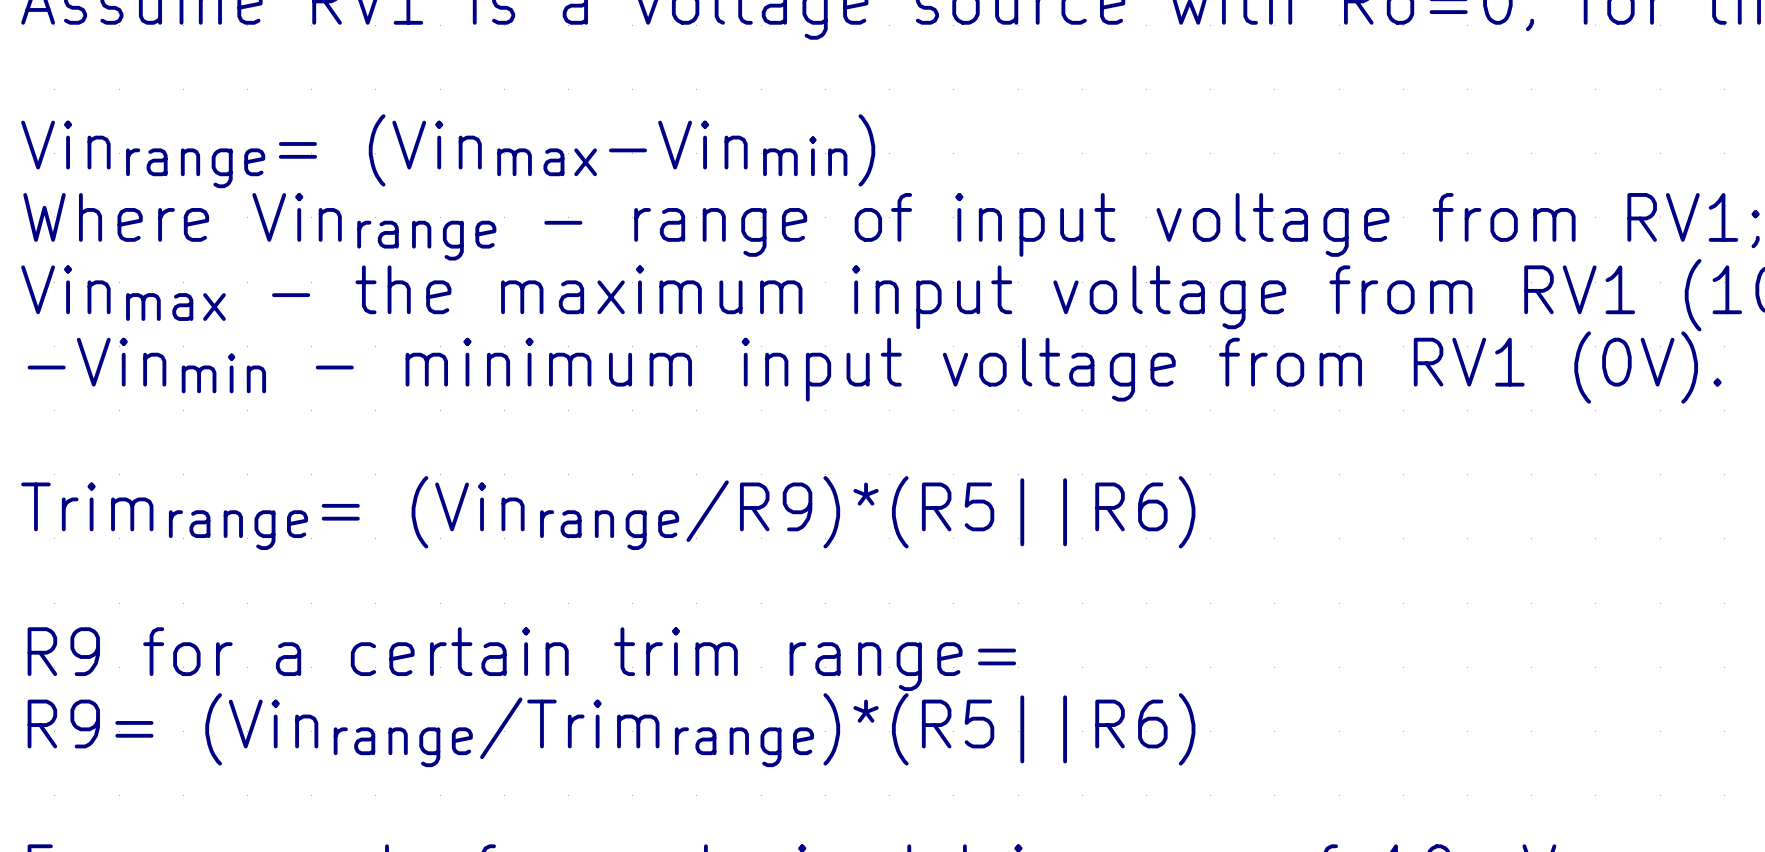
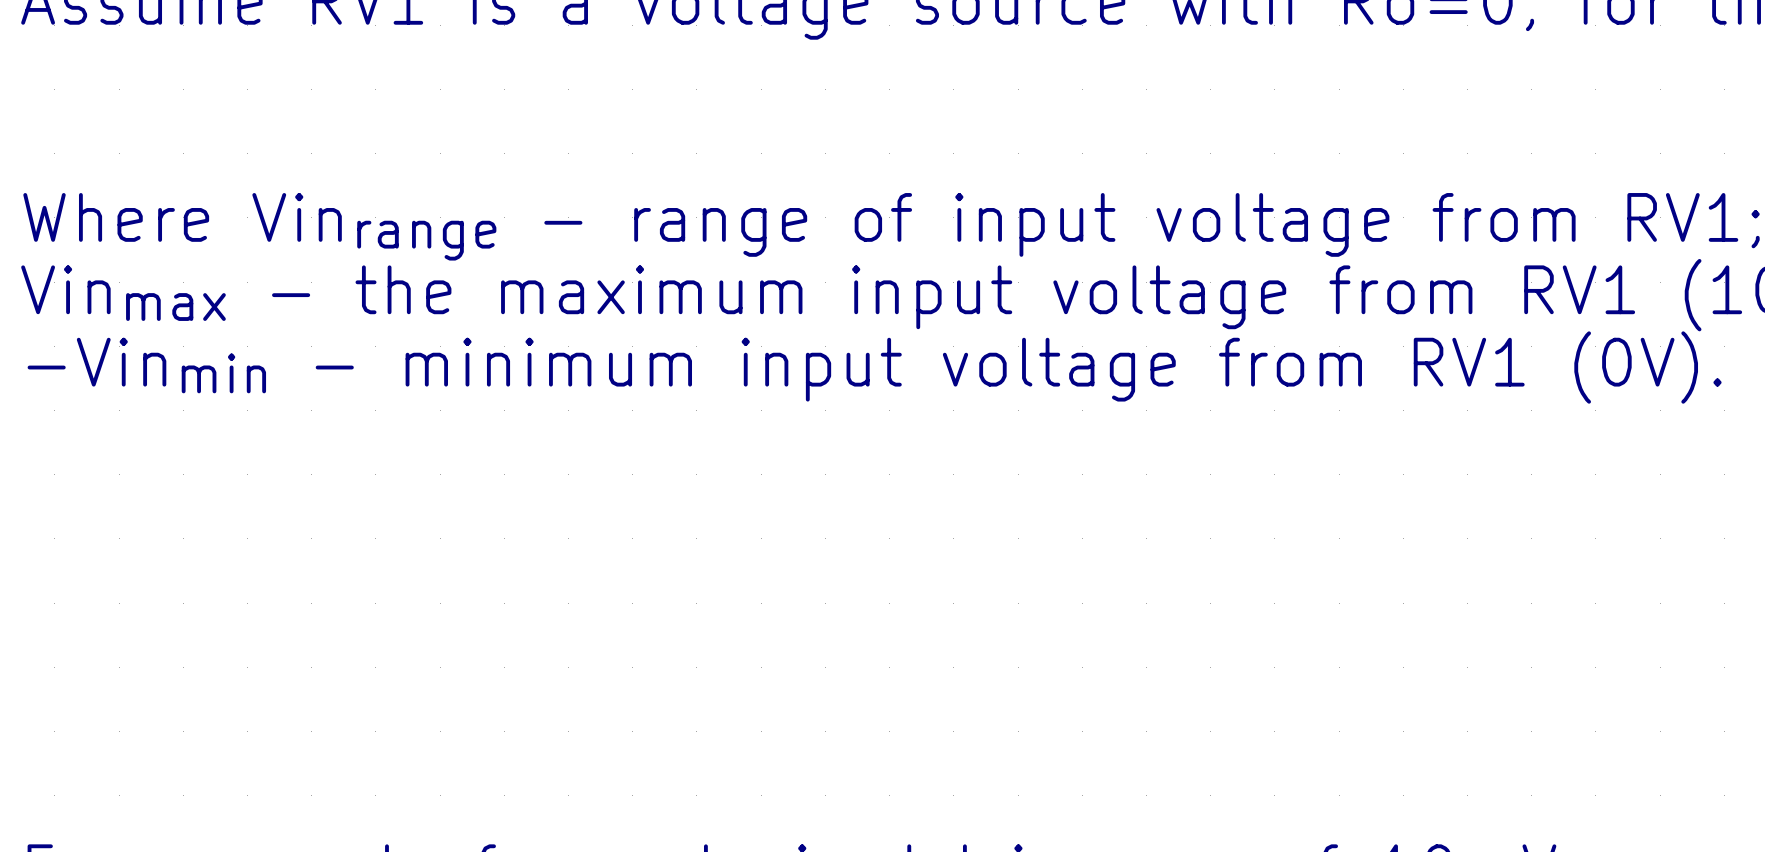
text: Vinrange= (Vinmax-Vinmin) (448, 151) -> none
text: Trimrange= (Vinrange/R9)*(R5||R6) (608, 513) -> none
text: R9 for a certain trim range= (521, 659) -> none
text: R9= (Vinrange/Trimrange)*(R5||R6) (611, 730) -> none

